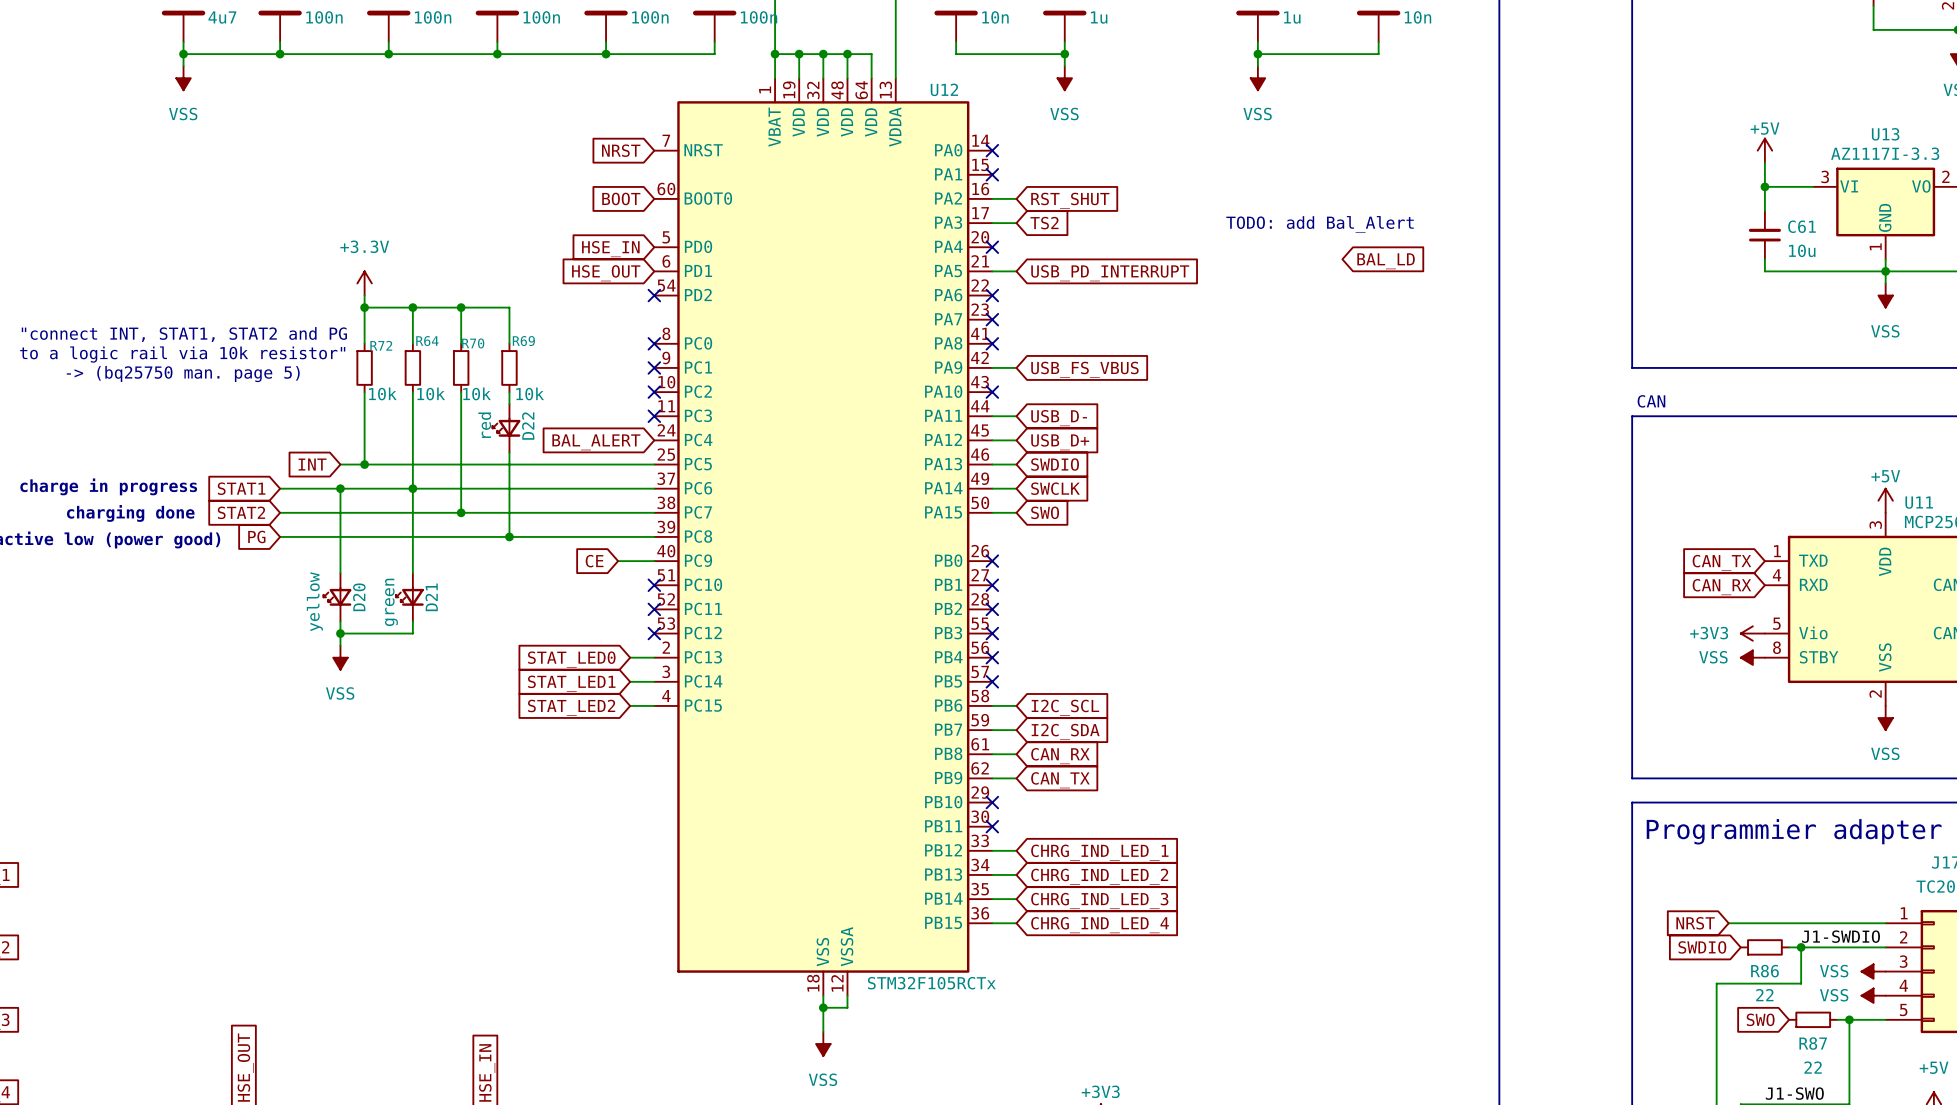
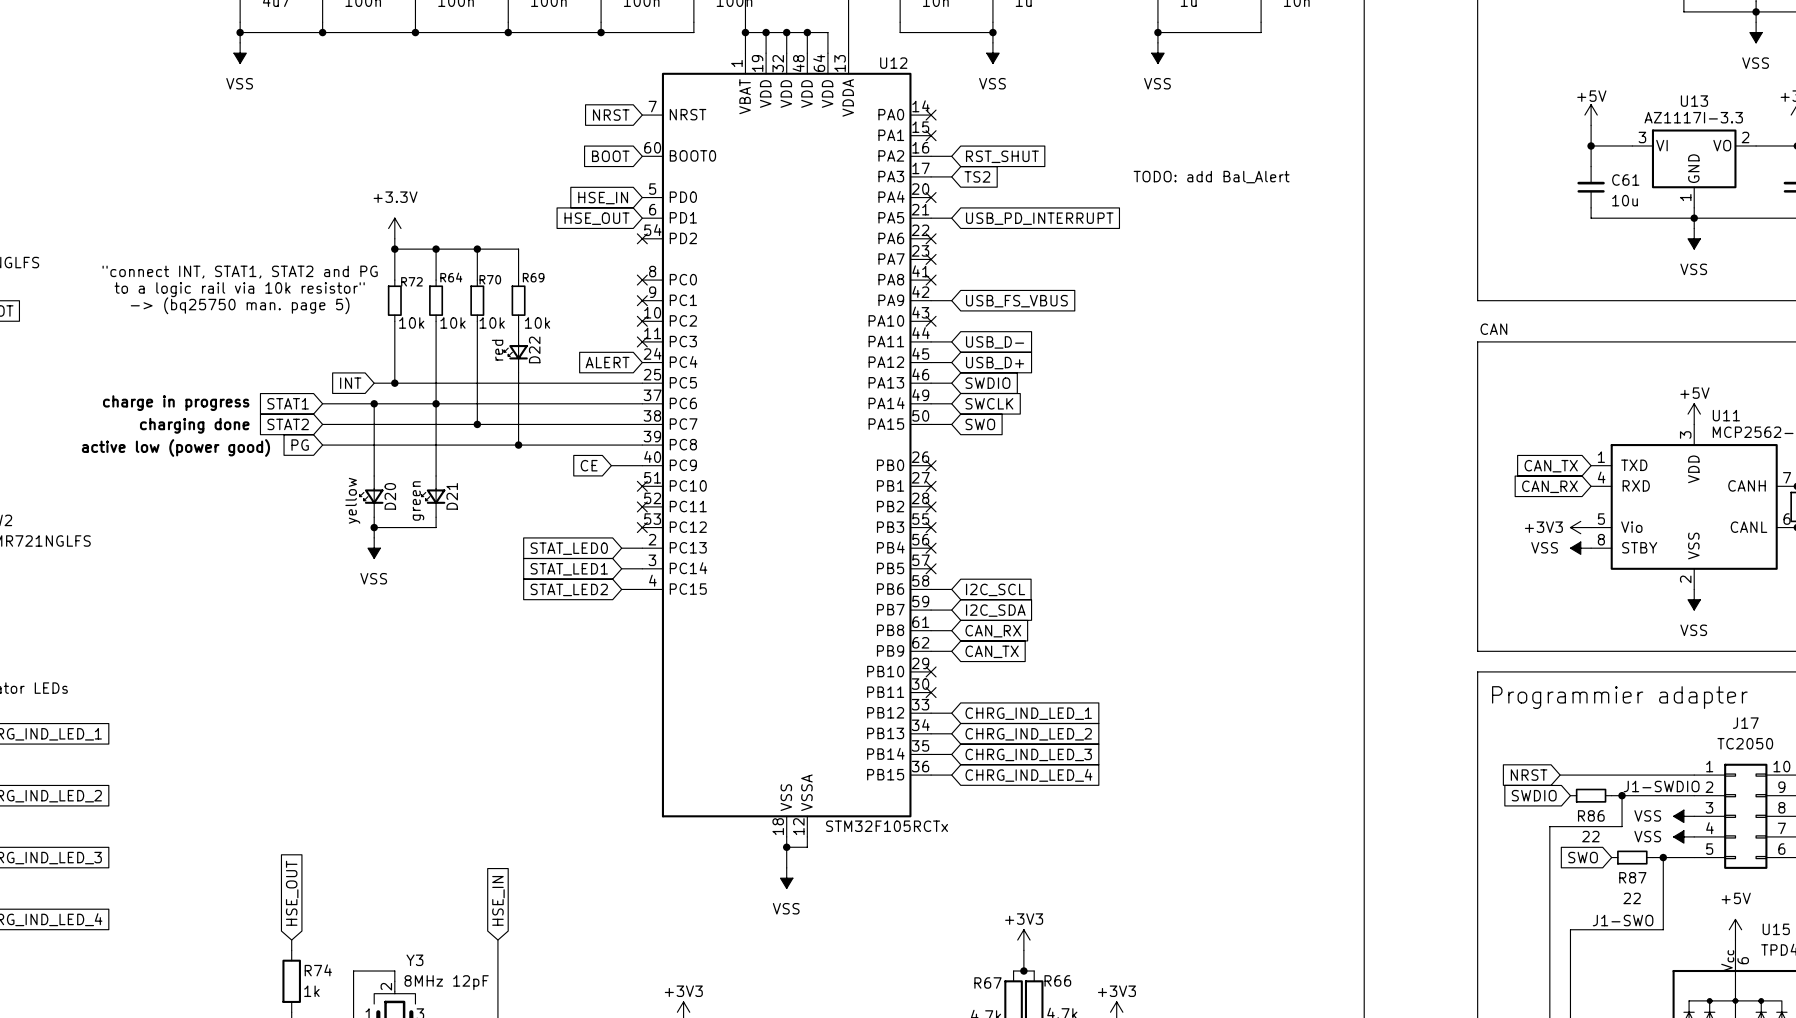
global label: BAL_LD (1386, 261) -> none
global label: BAL_ALERT (596, 442) -> ALERT (607, 362)

